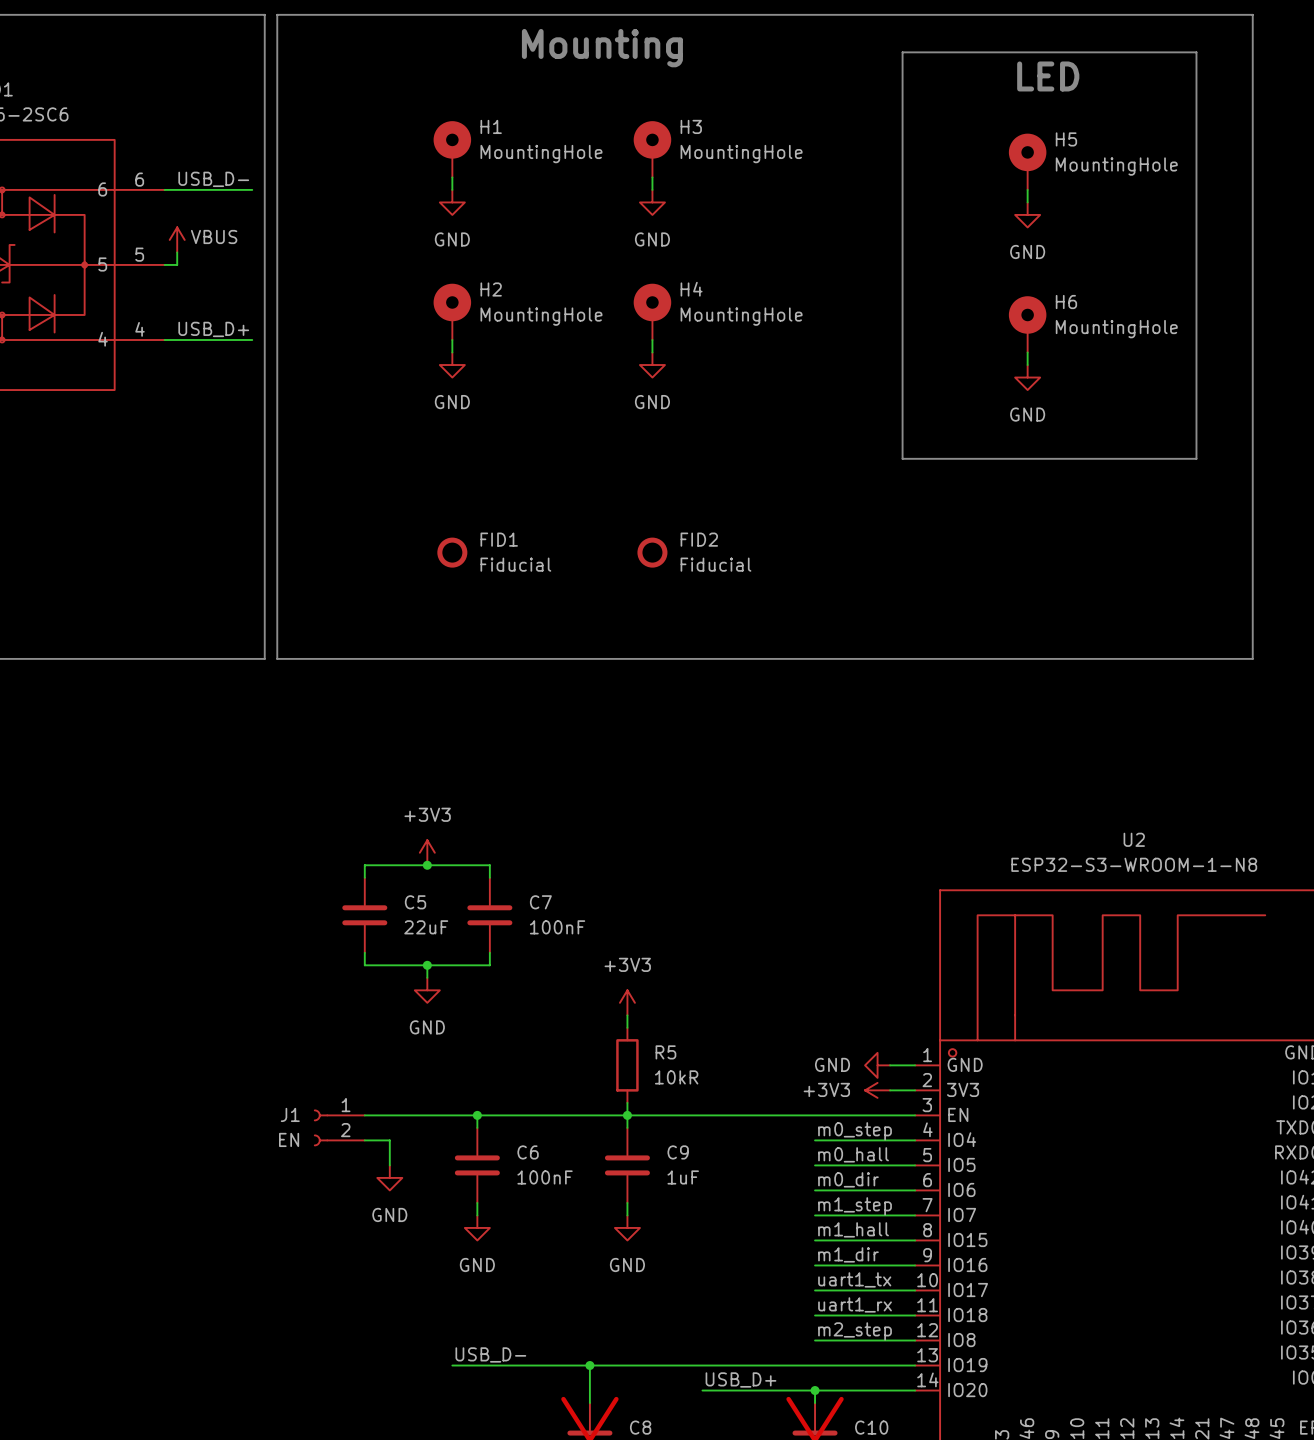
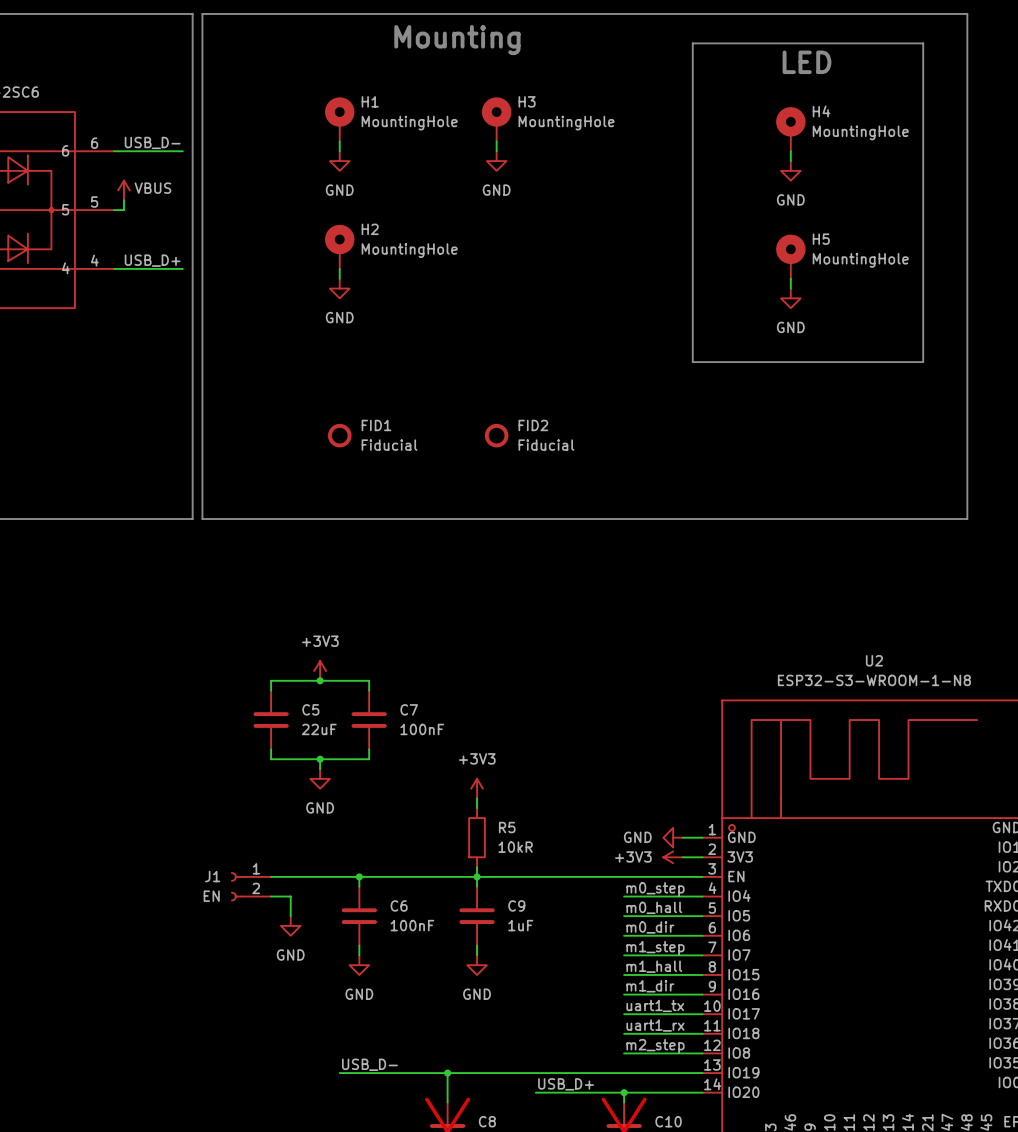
H5 name: H5 (1066, 139) -> H4 (821, 111)
H6 name: H6 (1066, 302) -> H5 (821, 239)
H4: MountingHole (652, 311) -> none
wire: (652, 340) (652, 352) -> none
power symbol: GND (652, 365) -> none

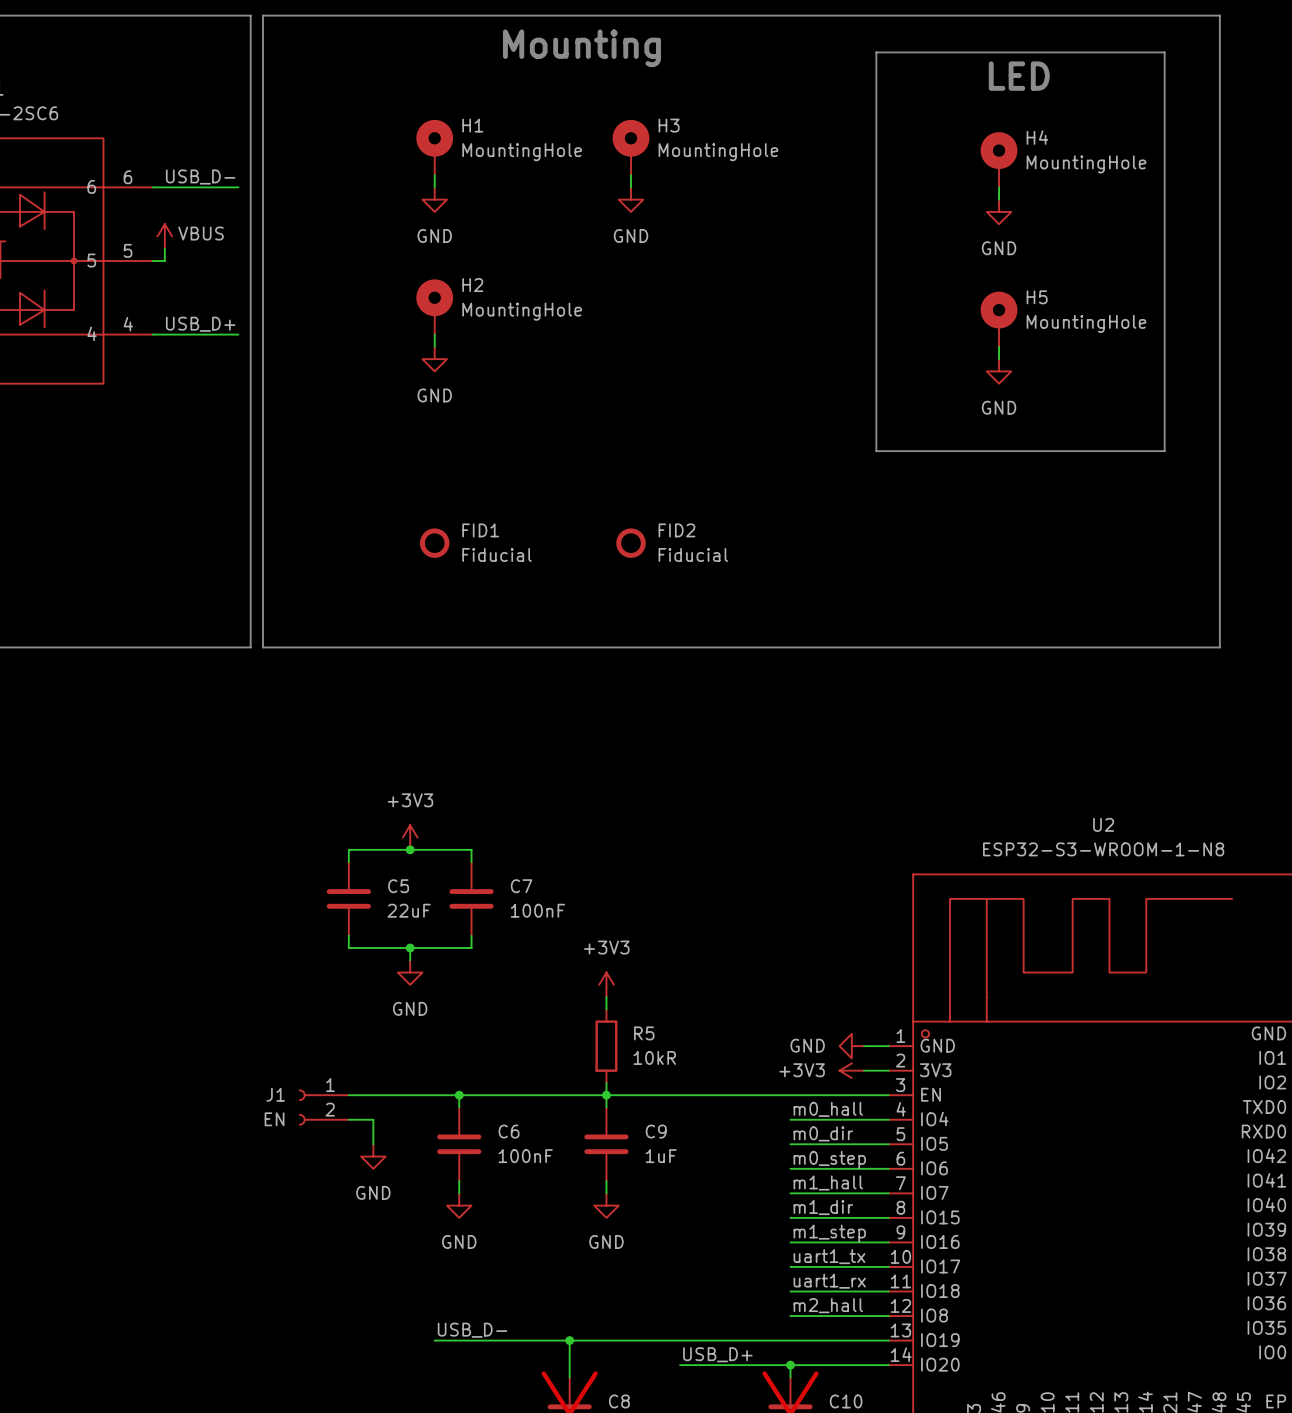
label: m0_step (655, 889) -> m0_hall (828, 1109)
label: m0_hall (654, 907) -> m0_dir (823, 1133)
label: m0_dir (650, 927) -> m0_step (829, 1159)
label: m1_step (655, 948) -> m1_hall (828, 1182)
label: m1_hall (654, 966) -> m1_dir (823, 1207)
label: m1_dir (650, 986) -> m1_step (829, 1233)
label: m2_step (655, 1046) -> m2_hall (828, 1305)

